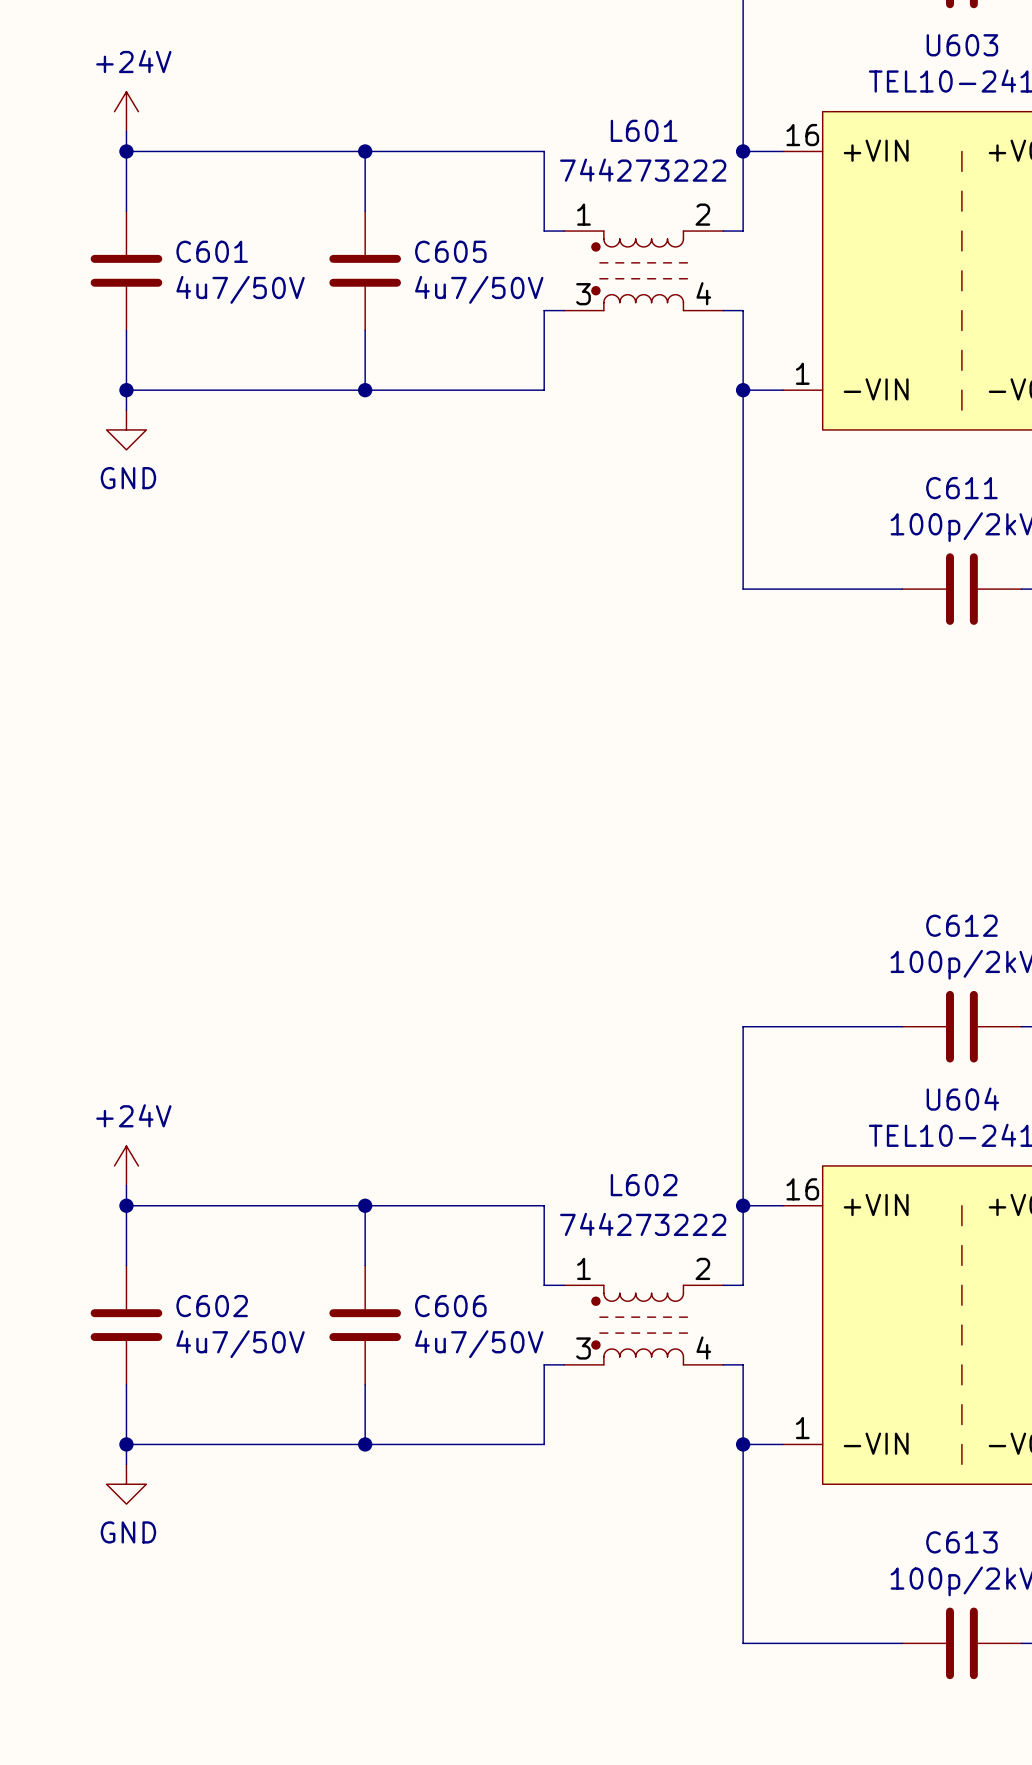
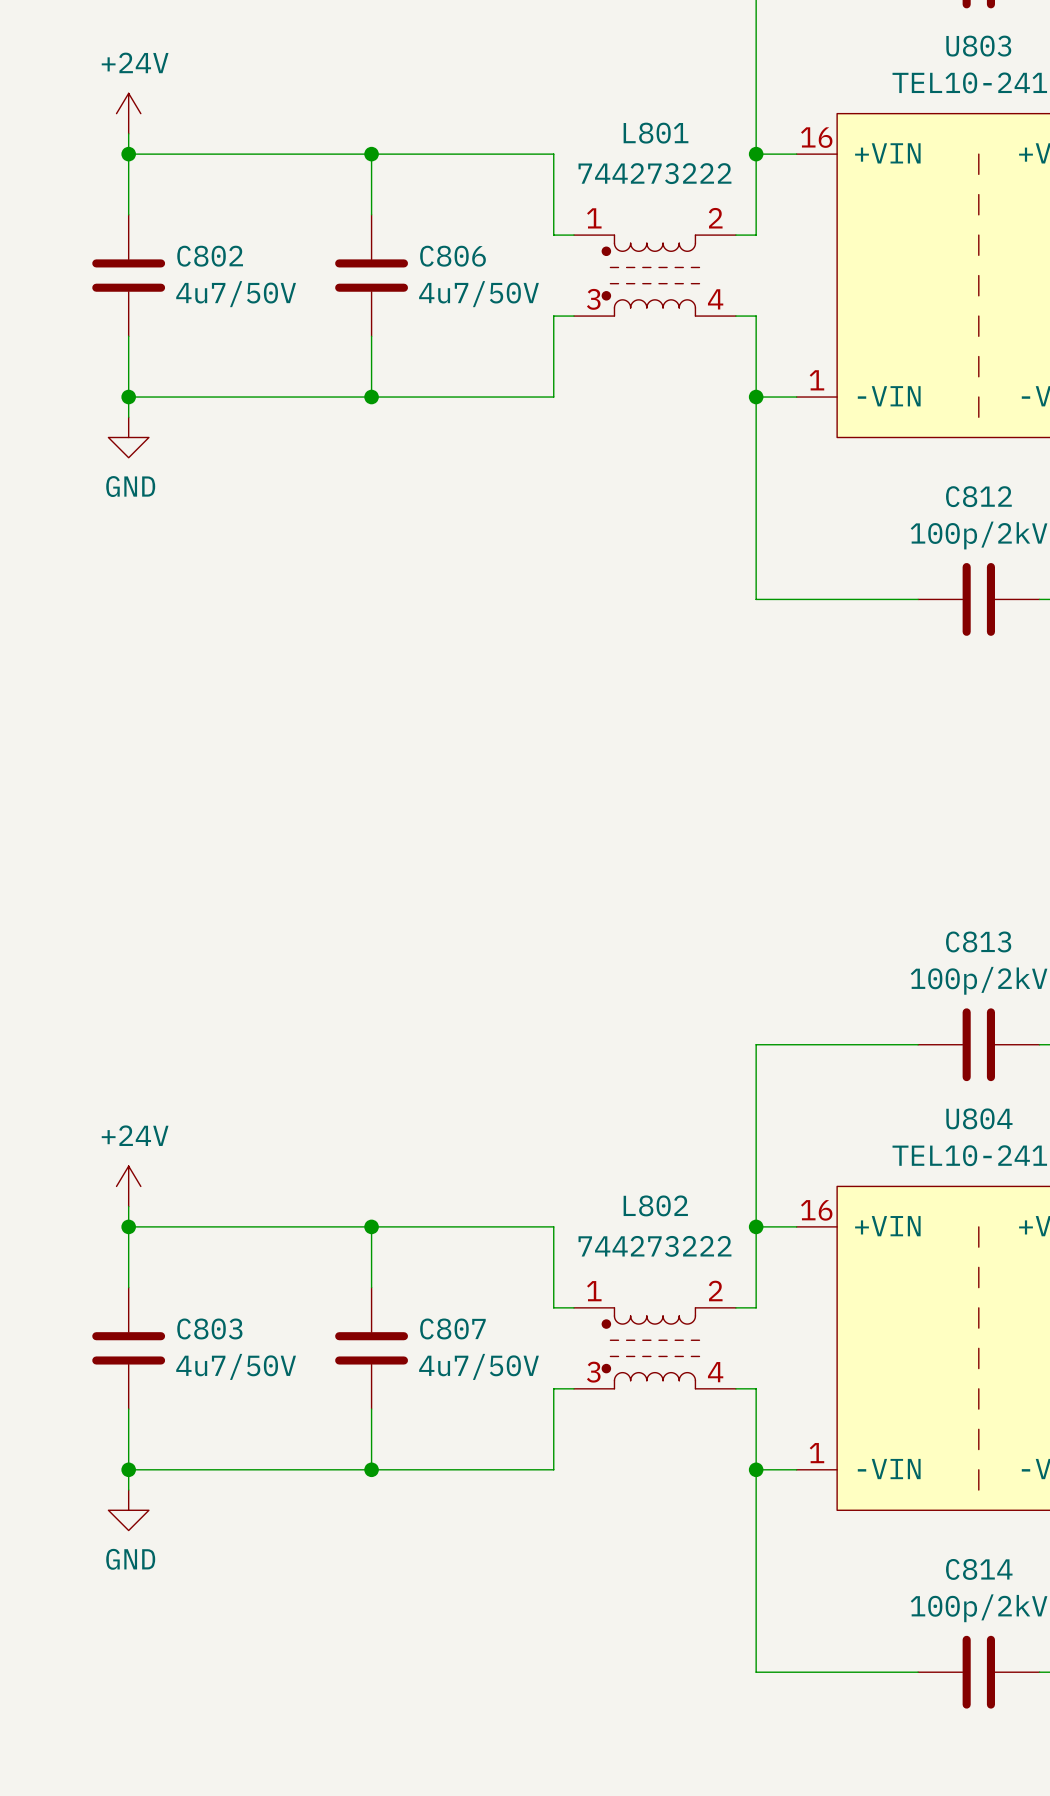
U603 name: U603 (962, 45) -> U803 (978, 46)
L601 name: L601 (644, 130) -> L801 (656, 133)
C601 name: C601 (212, 251) -> C802 (210, 256)
C605 name: C605 (450, 251) -> C806 (453, 256)
C611 name: C611 (961, 488) -> C812 (978, 496)
C612 name: C612 (961, 925) -> C813 (978, 941)
U604 name: U604 (962, 1099) -> U804 (979, 1118)
L602 name: L602 (644, 1185) -> L802 (655, 1205)
C602 name: C602 (212, 1306) -> C803 (209, 1328)
C606 name: C606 (450, 1306) -> C807 (452, 1328)
C613 name: C613 (961, 1542) -> C814 (979, 1569)

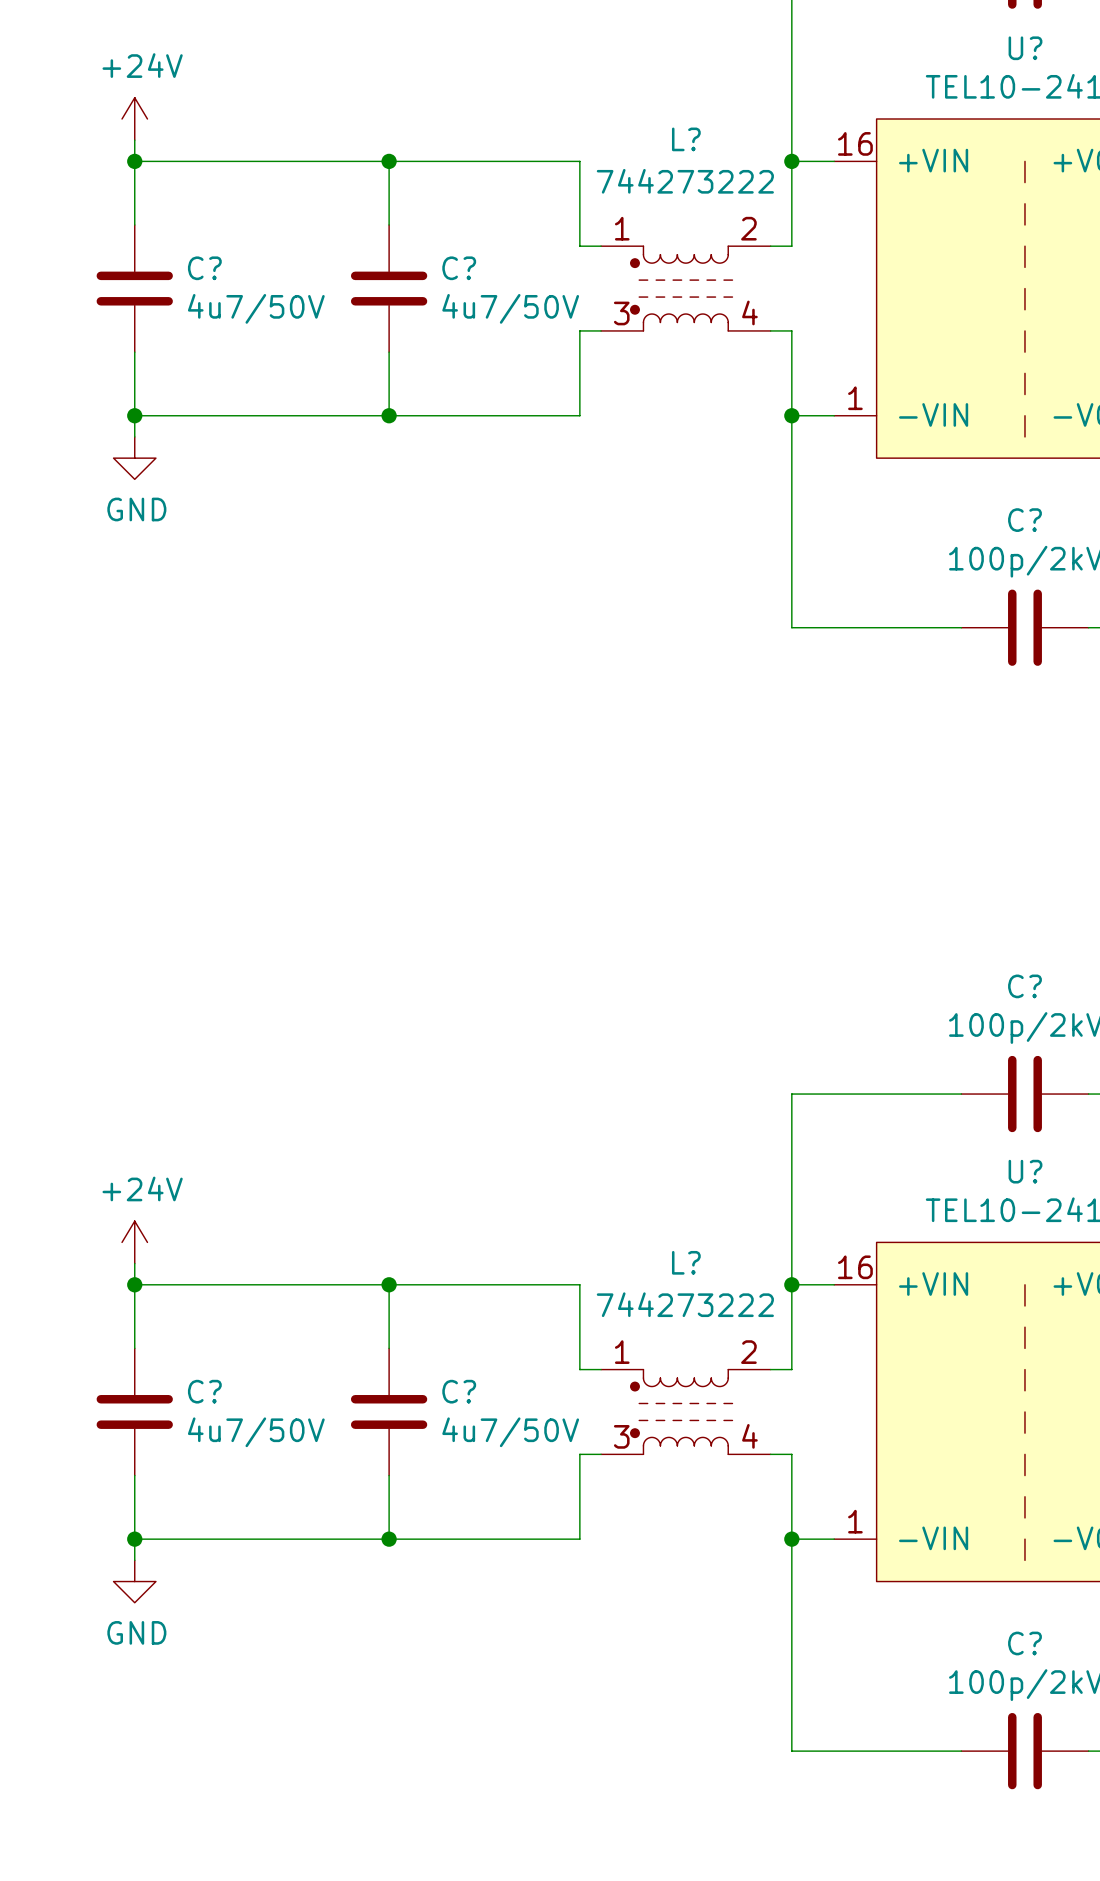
U803 name: U803 (978, 46) -> U? (1025, 48)
L801 name: L801 (656, 133) -> L? (686, 139)
C802 name: C802 (210, 256) -> C? (204, 268)
C806 name: C806 (453, 256) -> C? (459, 268)
C812 name: C812 (978, 496) -> C? (1024, 520)
C813 name: C813 (978, 941) -> C? (1024, 986)
U804 name: U804 (979, 1118) -> U? (1025, 1171)
L802 name: L802 (655, 1205) -> L? (686, 1262)
C803 name: C803 (209, 1328) -> C? (204, 1391)
C807 name: C807 (452, 1328) -> C? (459, 1391)
C814 name: C814 (979, 1569) -> C? (1024, 1643)

